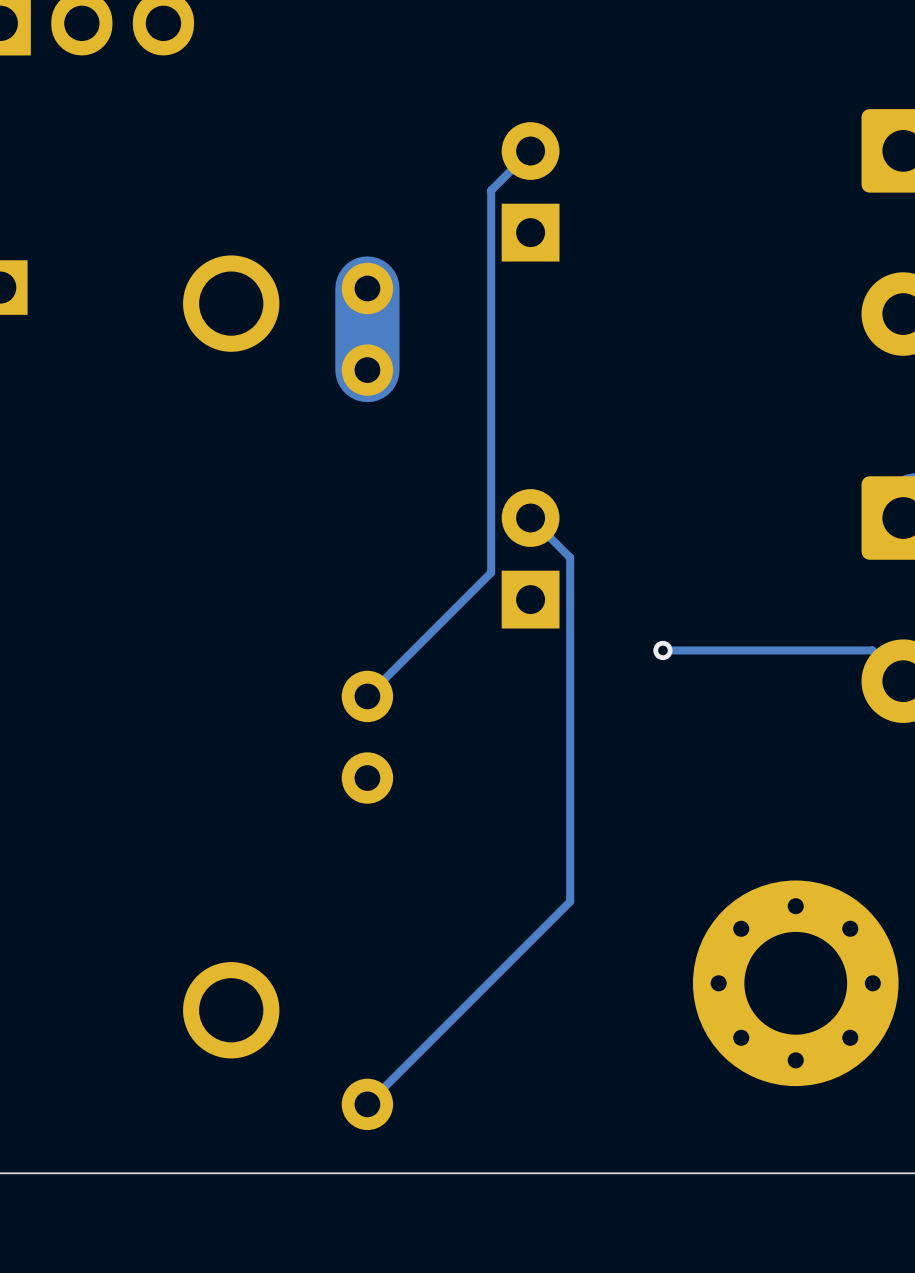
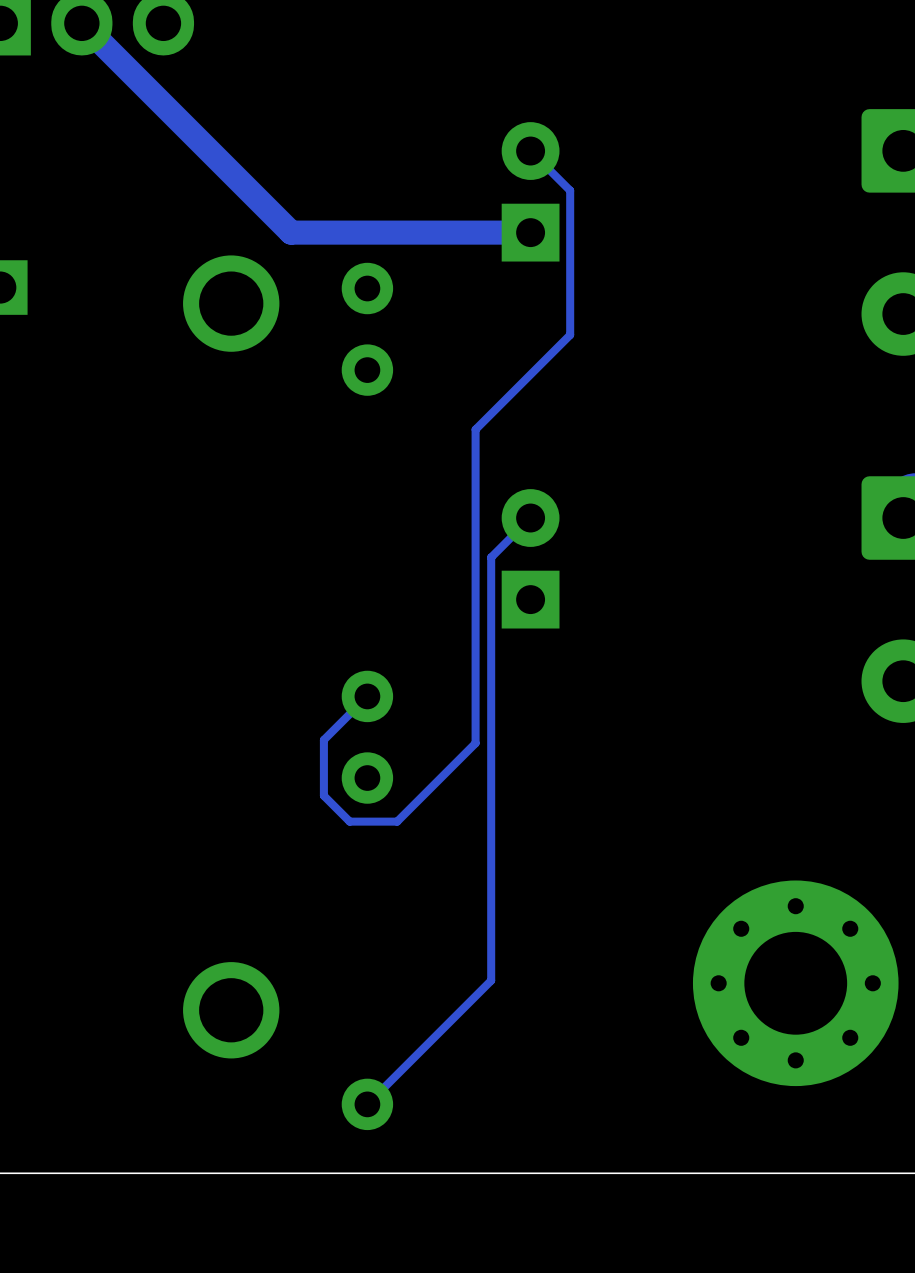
track: none -> (81, 23) (291, 232) (530, 232)
track: (530, 151) (491, 190) (491, 557) -> (530, 151) (570, 190) (570, 334) (475, 429) (475, 743) (397, 821) (349, 821) (323, 795) (323, 739) (367, 696)
track: (367, 288) (367, 370) -> none
track: (530, 518) (570, 557) (570, 901) (491, 980) -> (491, 572) (491, 980)
track: none -> (530, 518) (491, 557)
track: (491, 572) (367, 696) -> none
track: (662, 650) (872, 650) (903, 681) -> none
via: (662, 650) -> none

